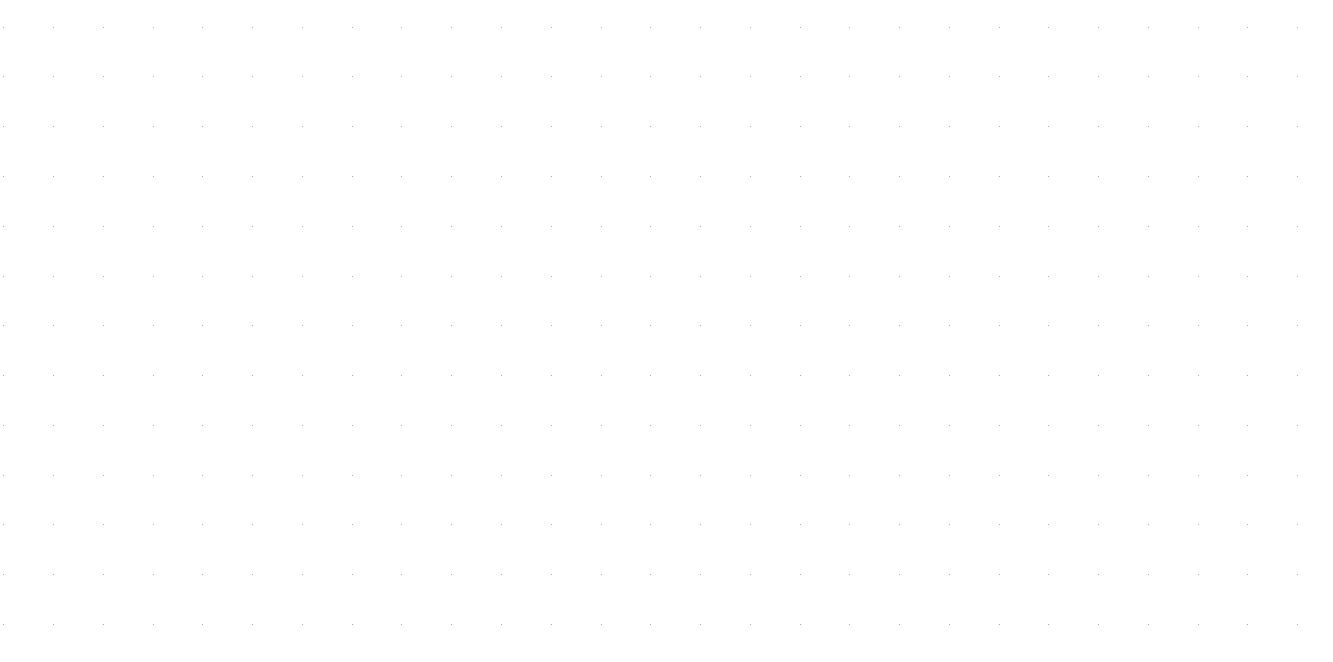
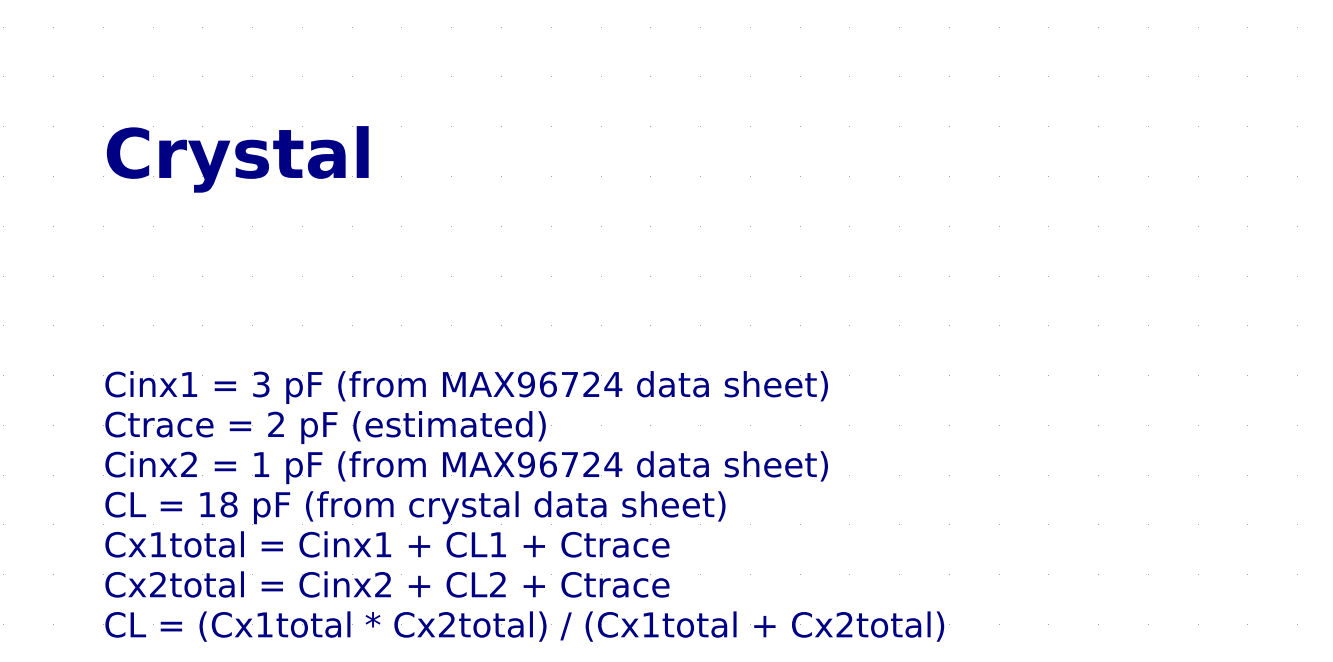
text: none -> Crystal (237, 159)
text: none -> Cinx1 = 3 pF (from MAX96724 data sheet) (466, 387)
text: none -> Ctrace = 2 pF (estimated) (325, 427)
text: none -> Cinx2 = 1 pF (from MAX96724 data sheet) (466, 467)
text: none -> CL = 18 pF (from crystal data sheet) (415, 507)
text: none -> Cx1total = Cinx1 + CL1 + Ctrace (387, 544)
text: none -> Cx2total = Cinx2 + CL2 + Ctrace (387, 584)
text: none -> CL = (Cx1total * Cx2total) / (Cx1total + Cx2total) (524, 626)

